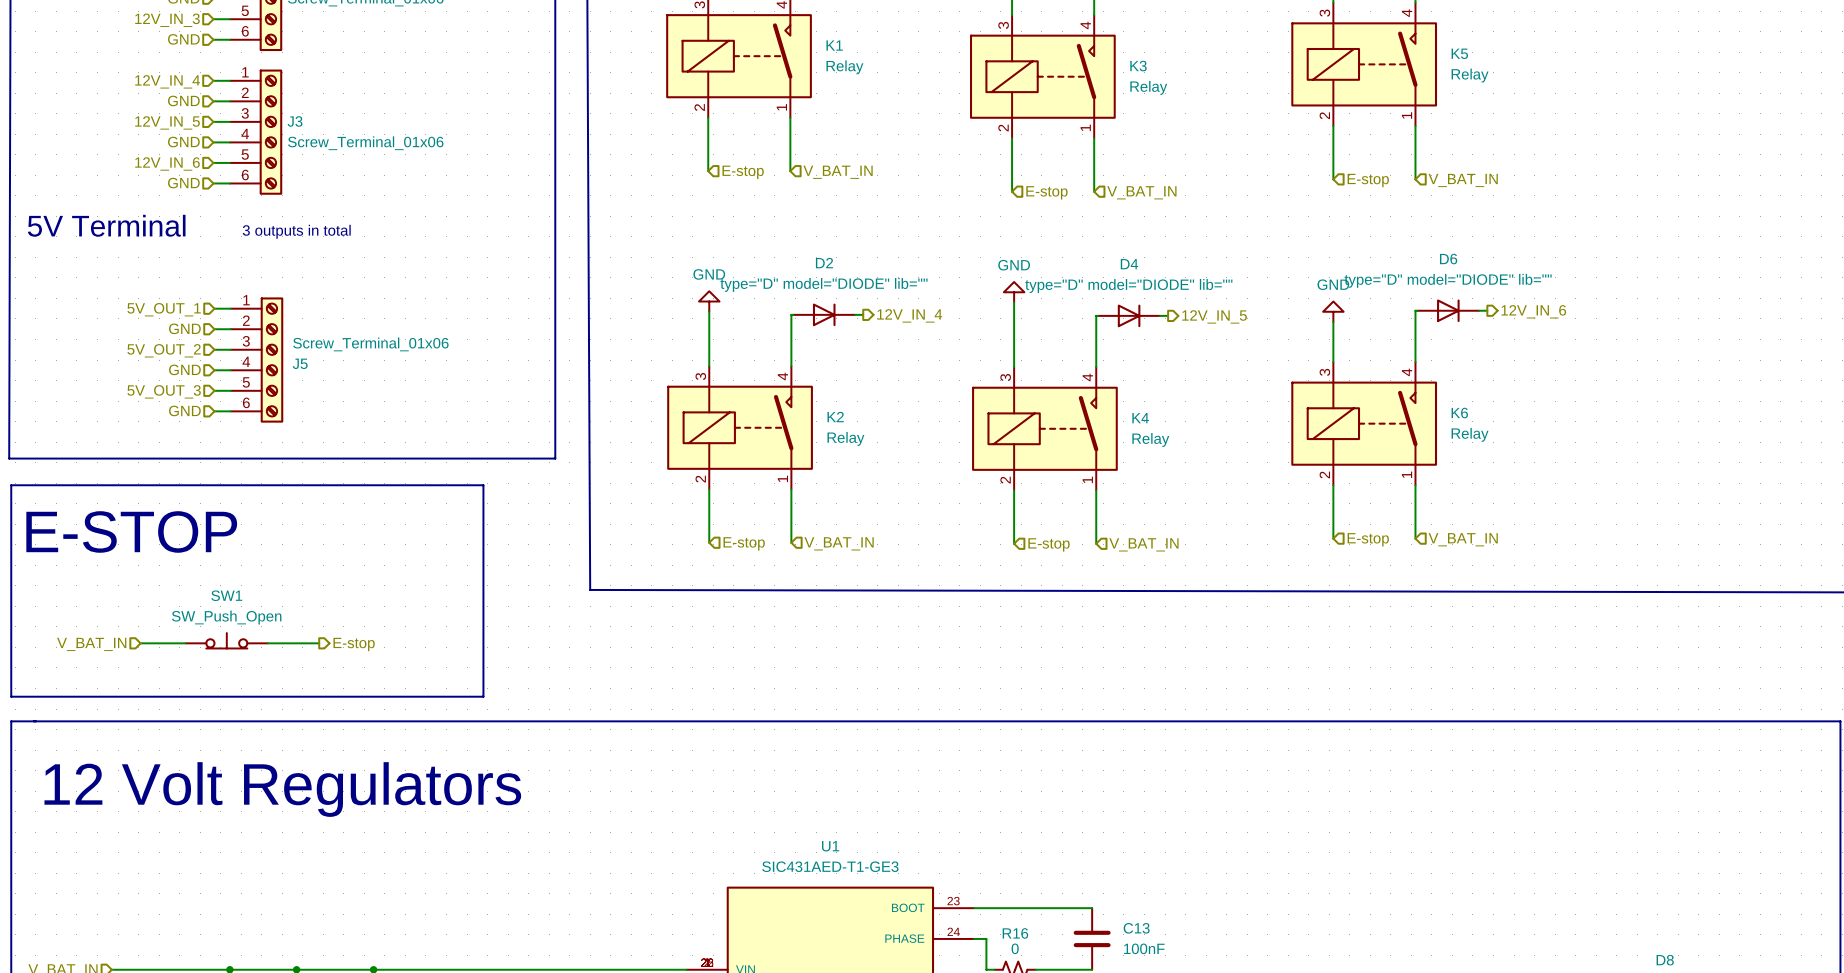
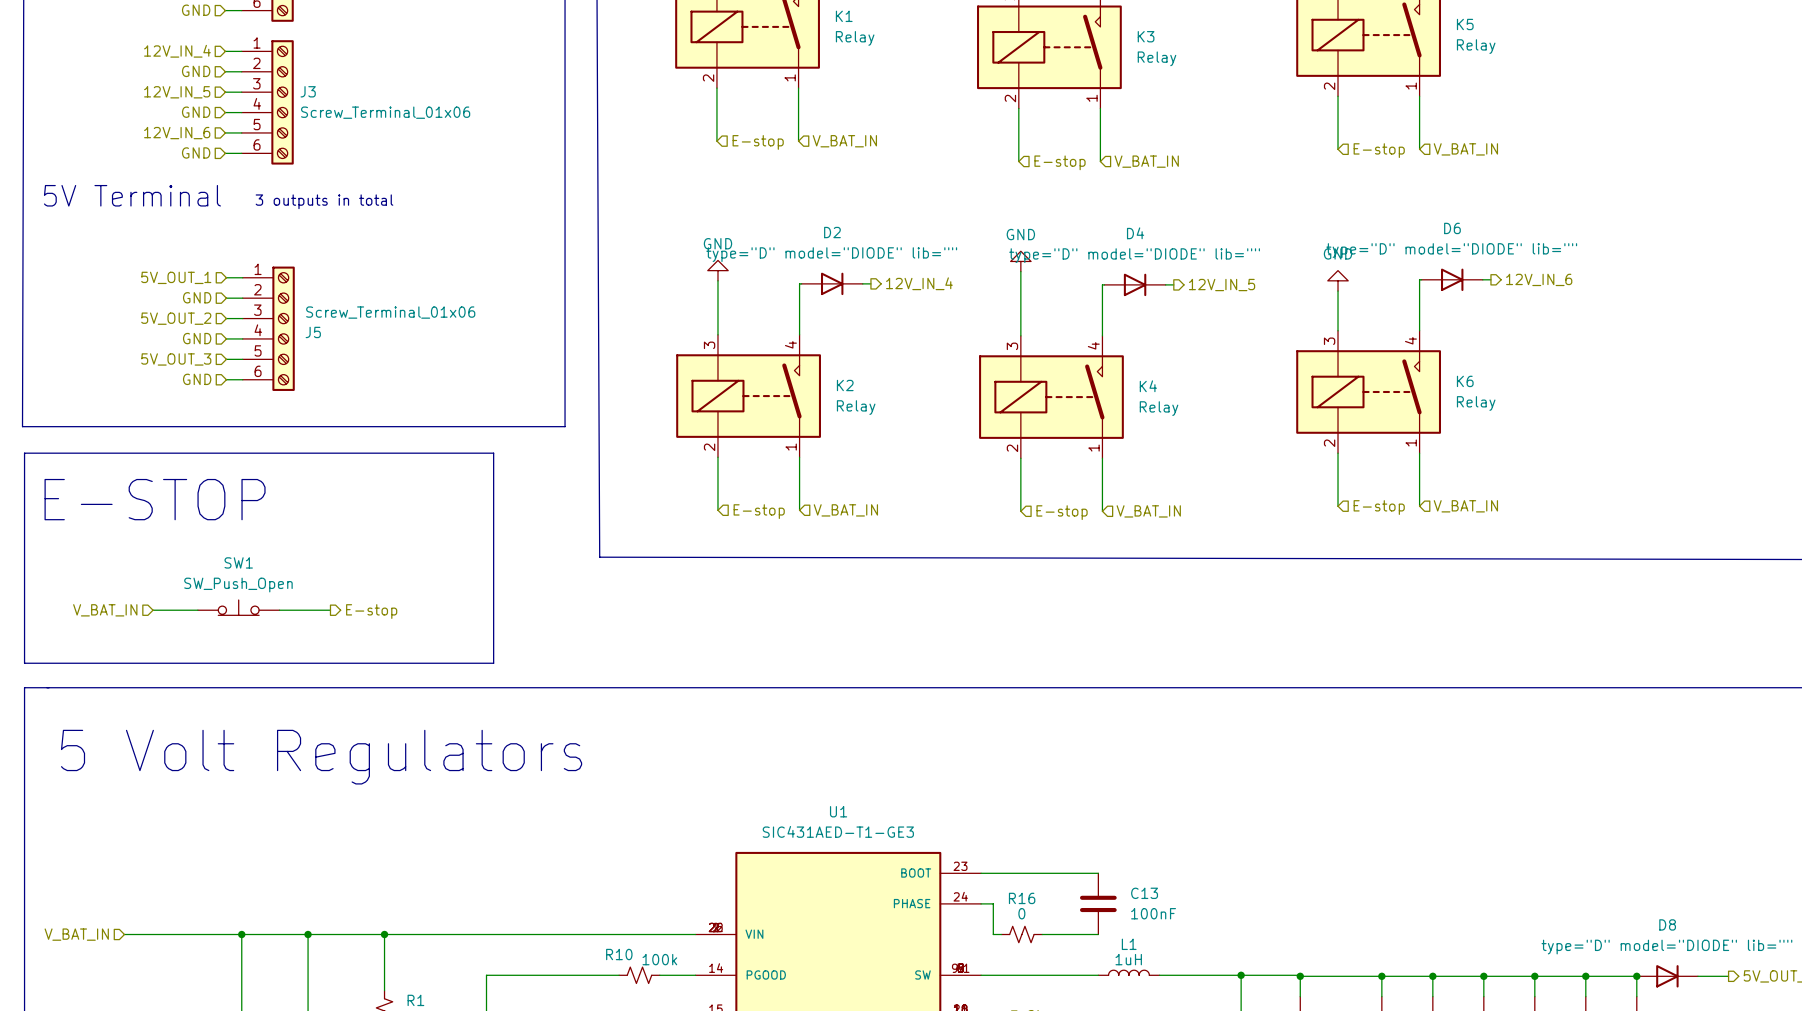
text: 12 Volt Regulators (282, 789) -> 5 Volt Regulators (321, 757)

